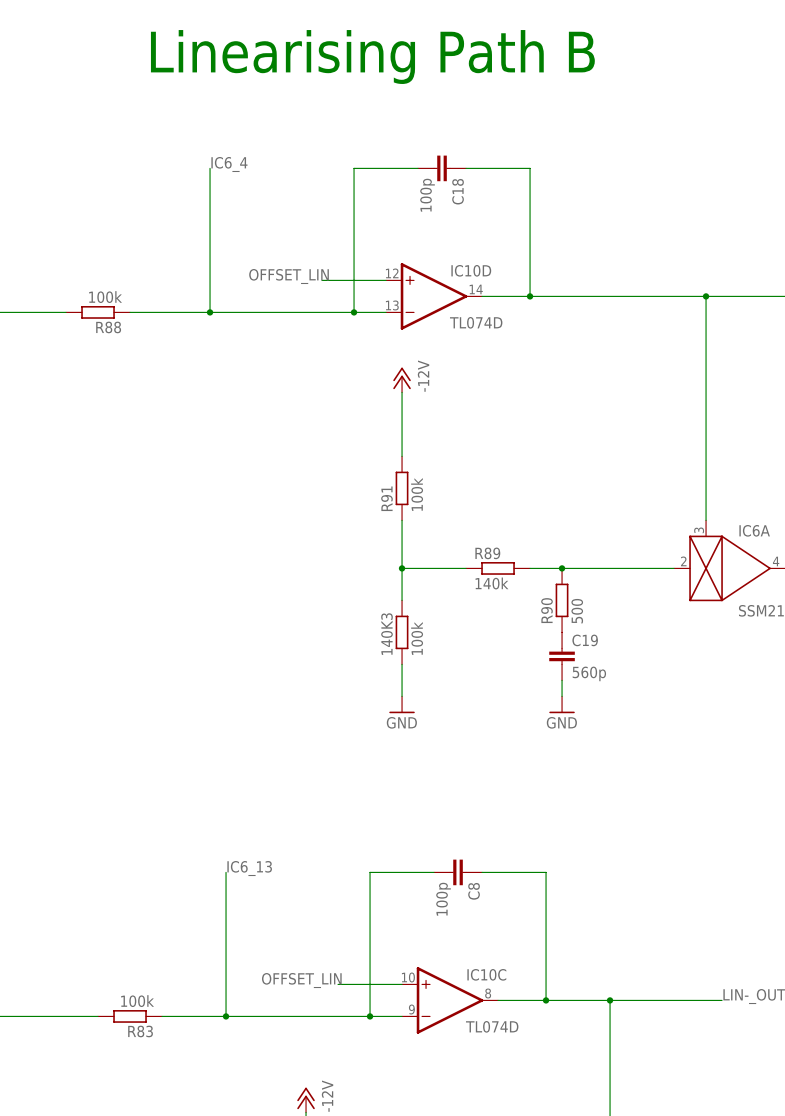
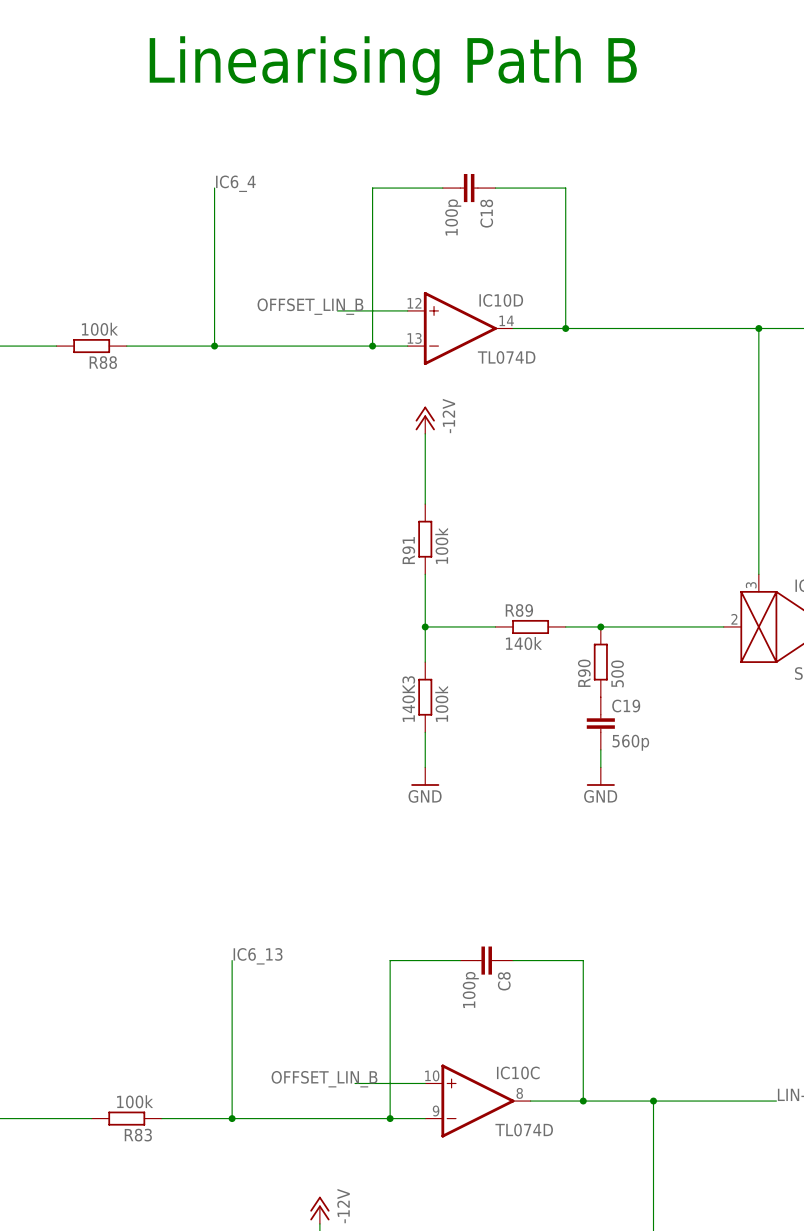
label: OFFSET_LIN (289, 276) -> OFFSET_LIN_B (310, 306)
label: OFFSET_LIN (301, 980) -> OFFSET_LIN_B (324, 1079)

